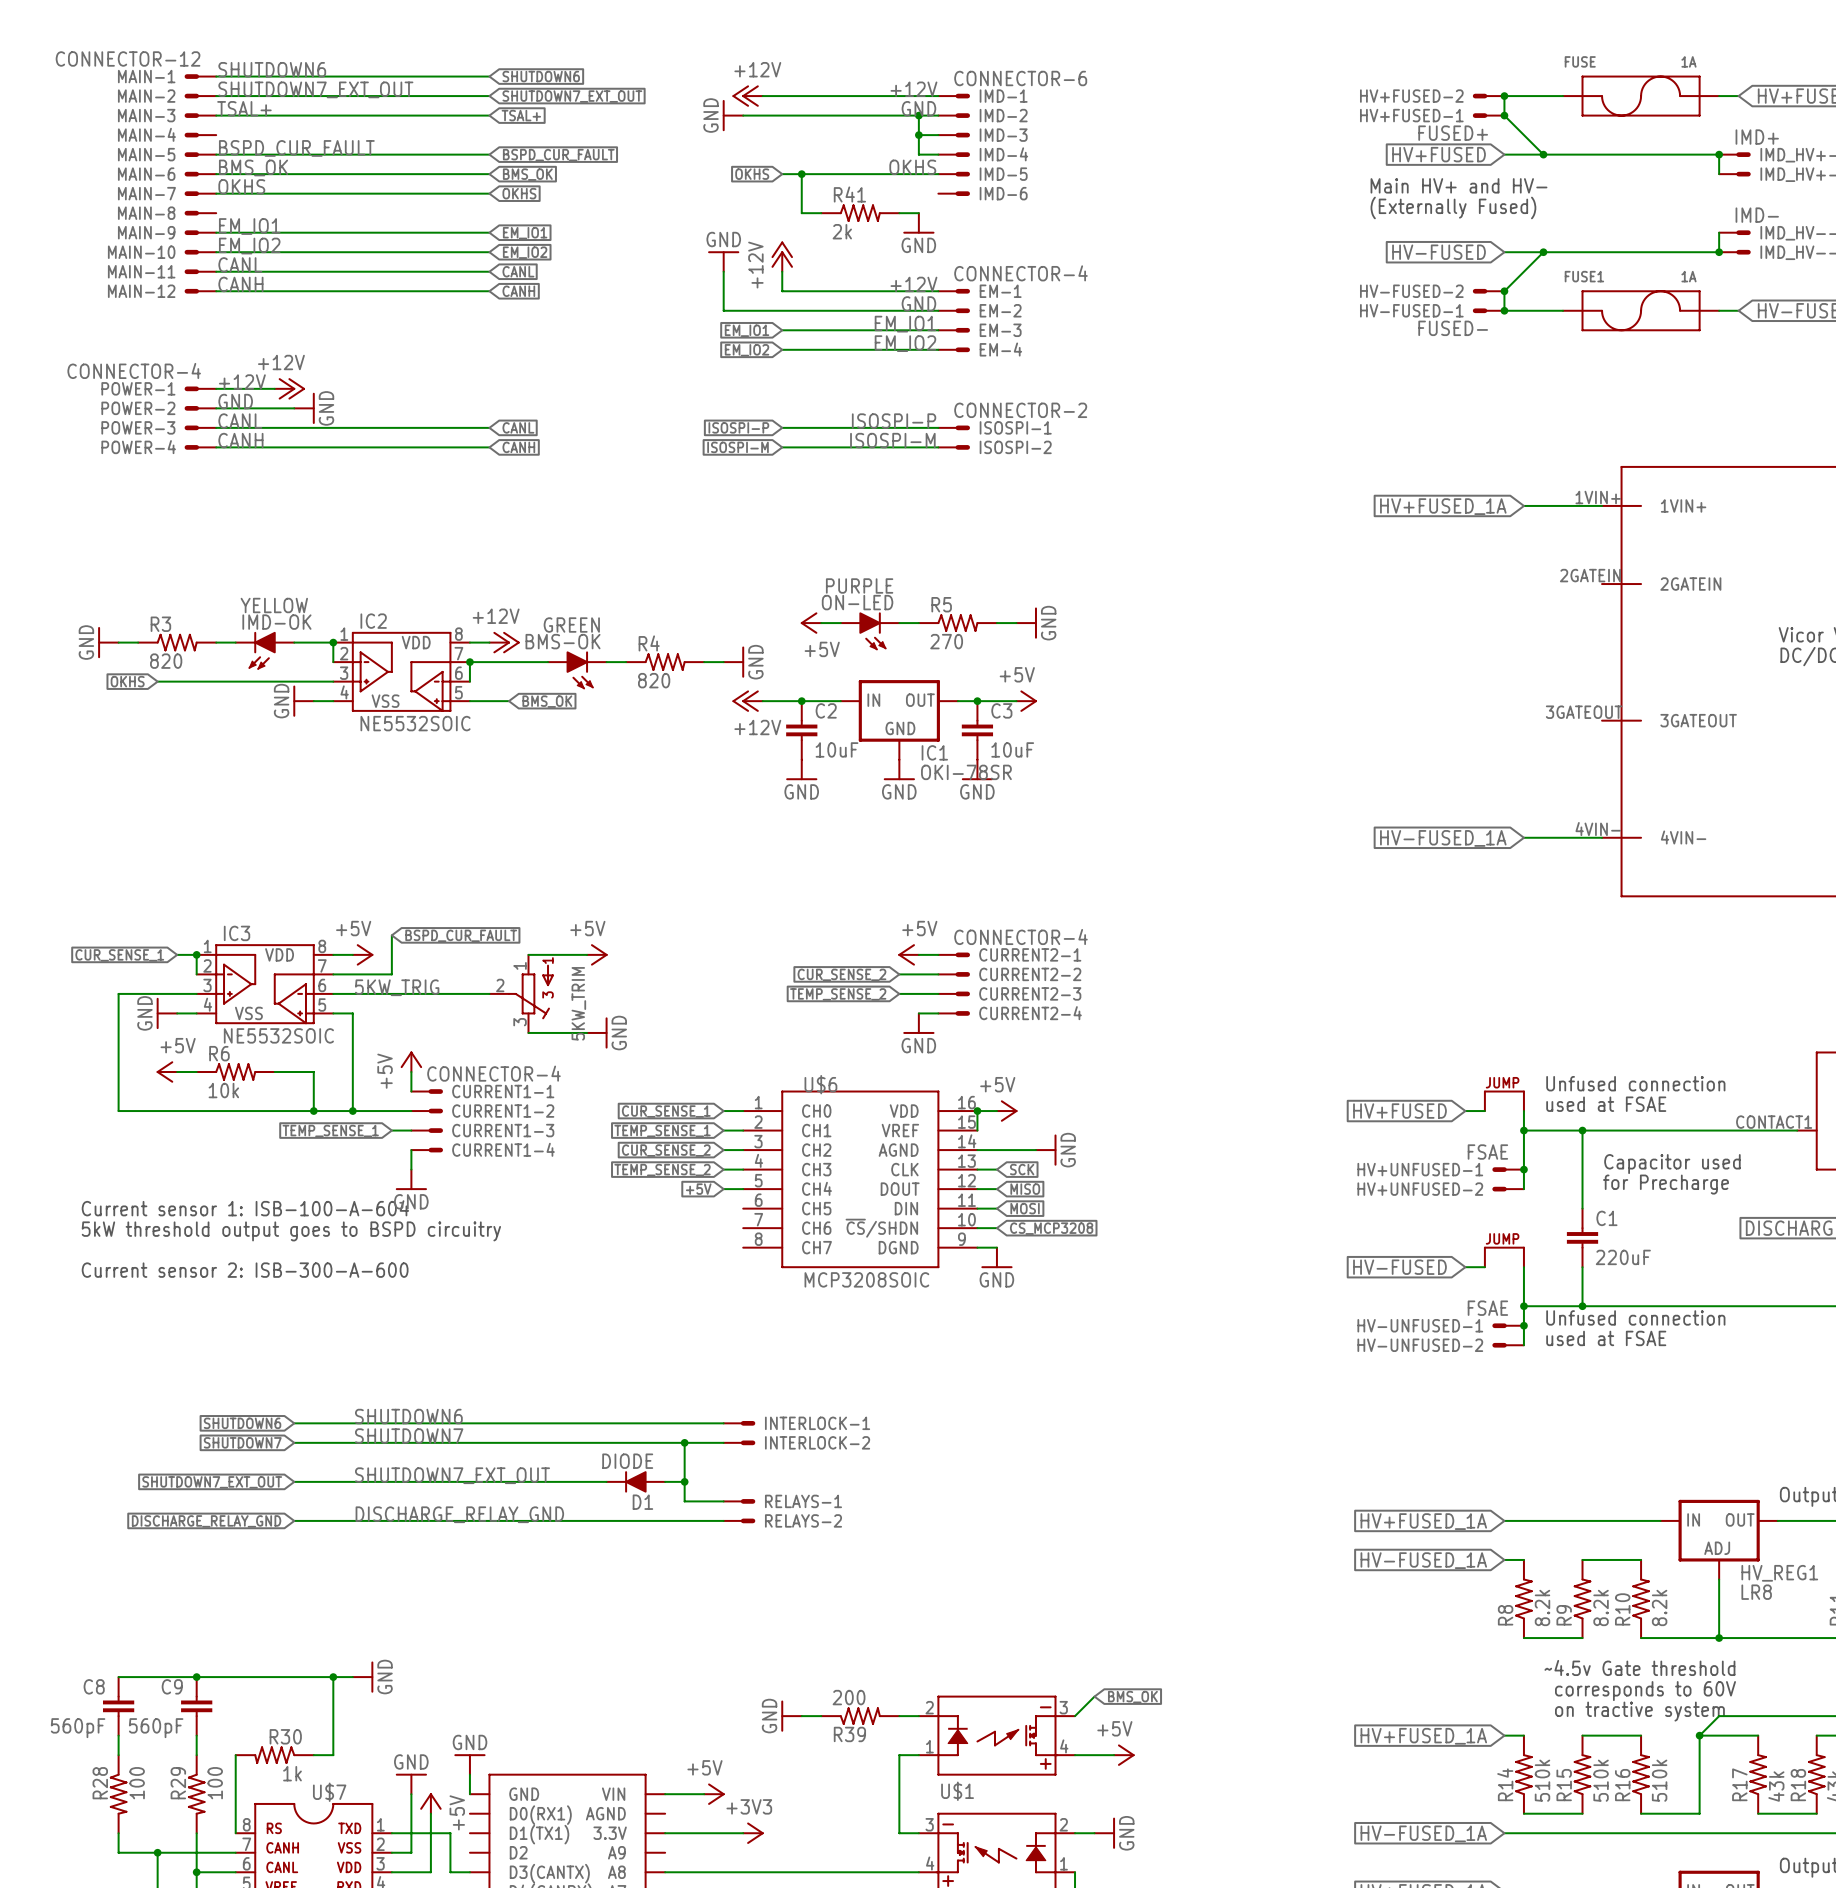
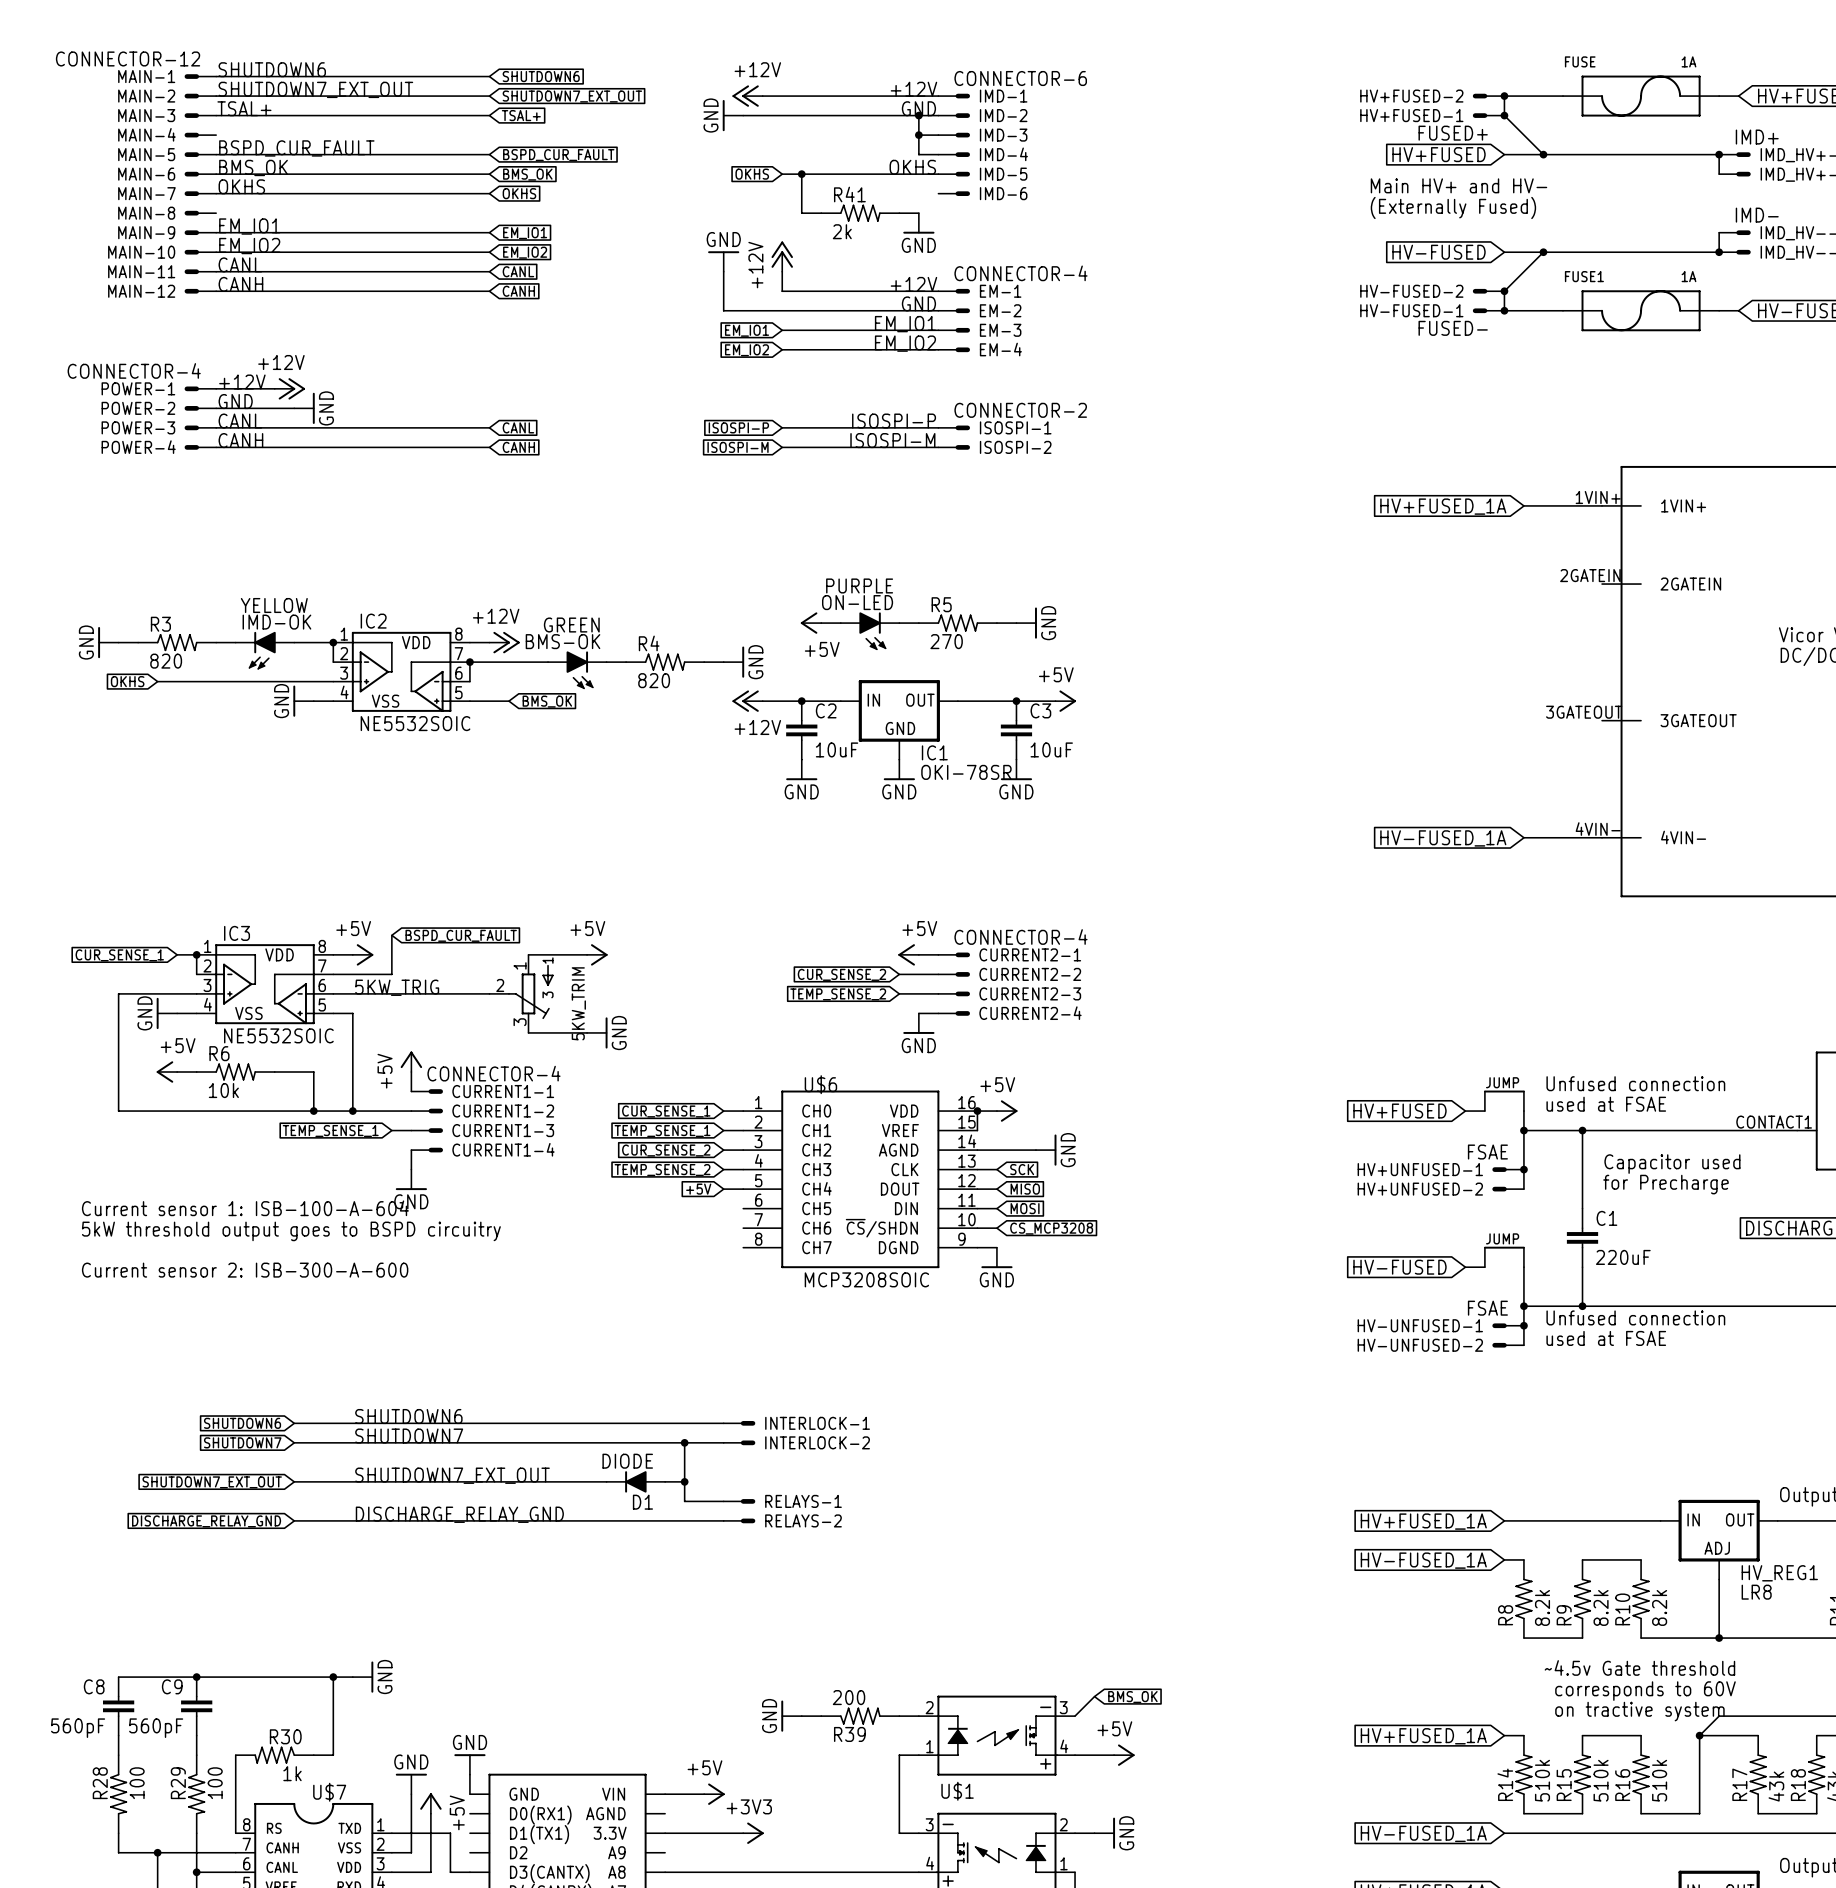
junction position: (977, 701) -> (1016, 701)
power symbol position: +5V (1026, 701) -> +5V (1065, 701)
C3 position: (977, 730) -> (1016, 730)
power symbol position: GND (977, 769) -> GND (1016, 769)

